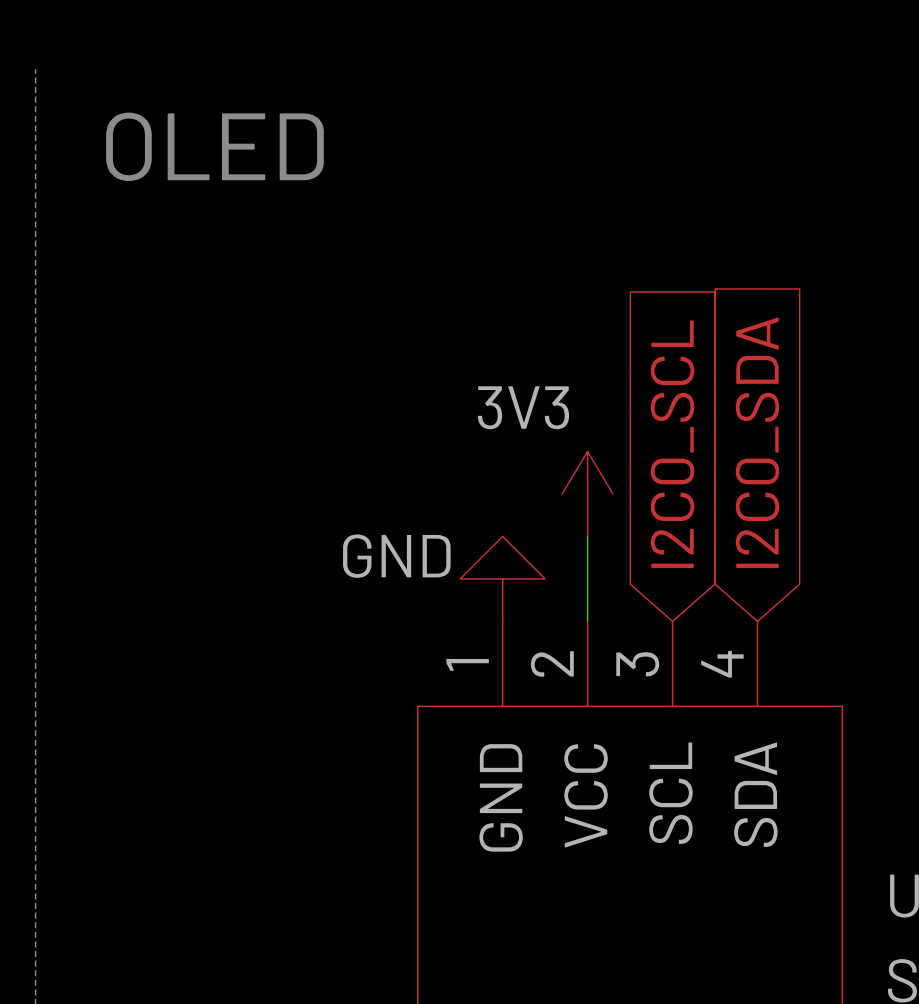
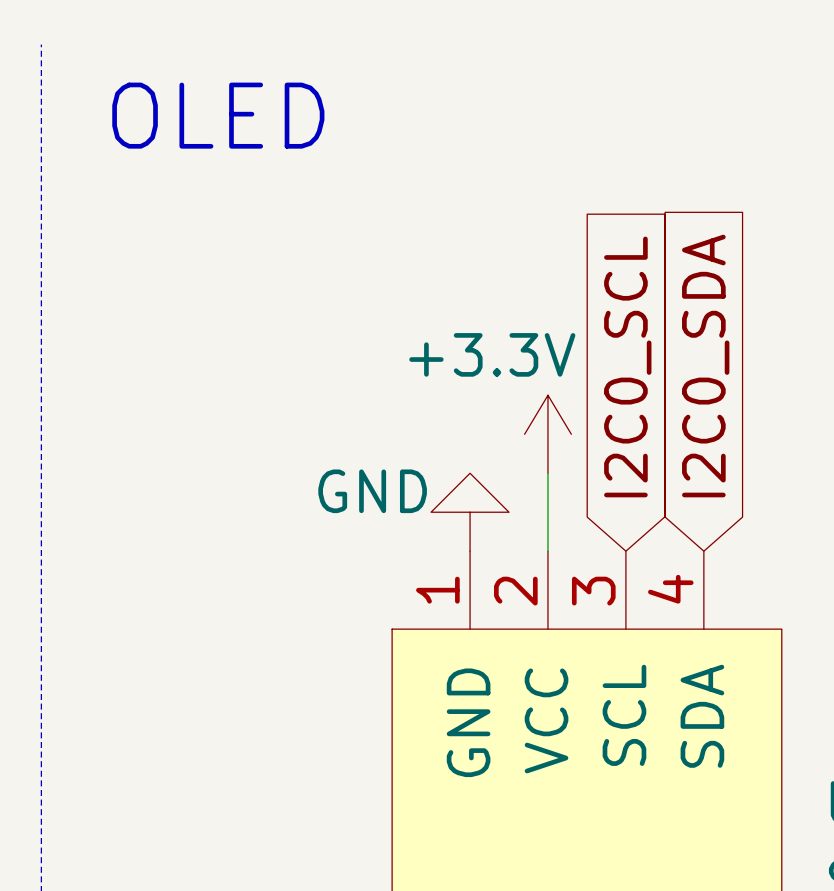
power symbol: 3V3 (587, 494) -> +3.3V (547, 434)

